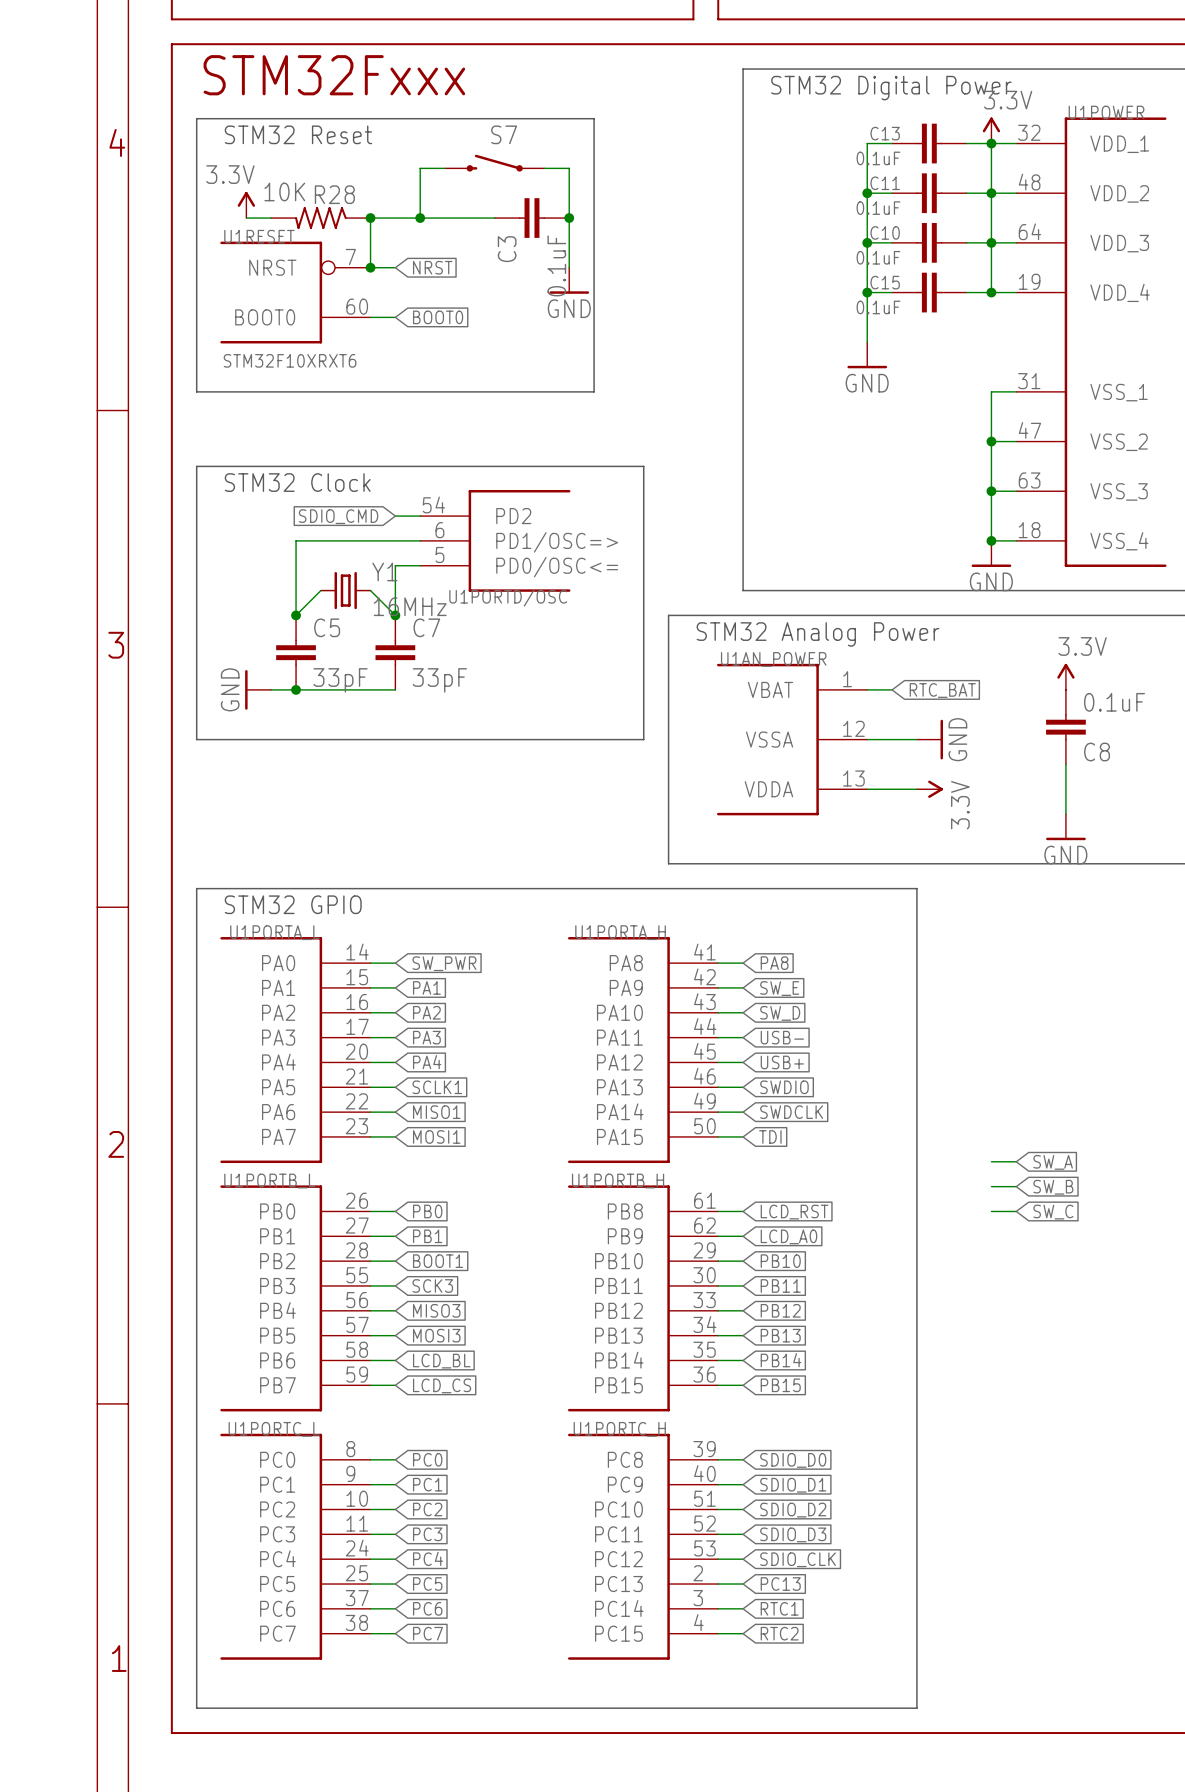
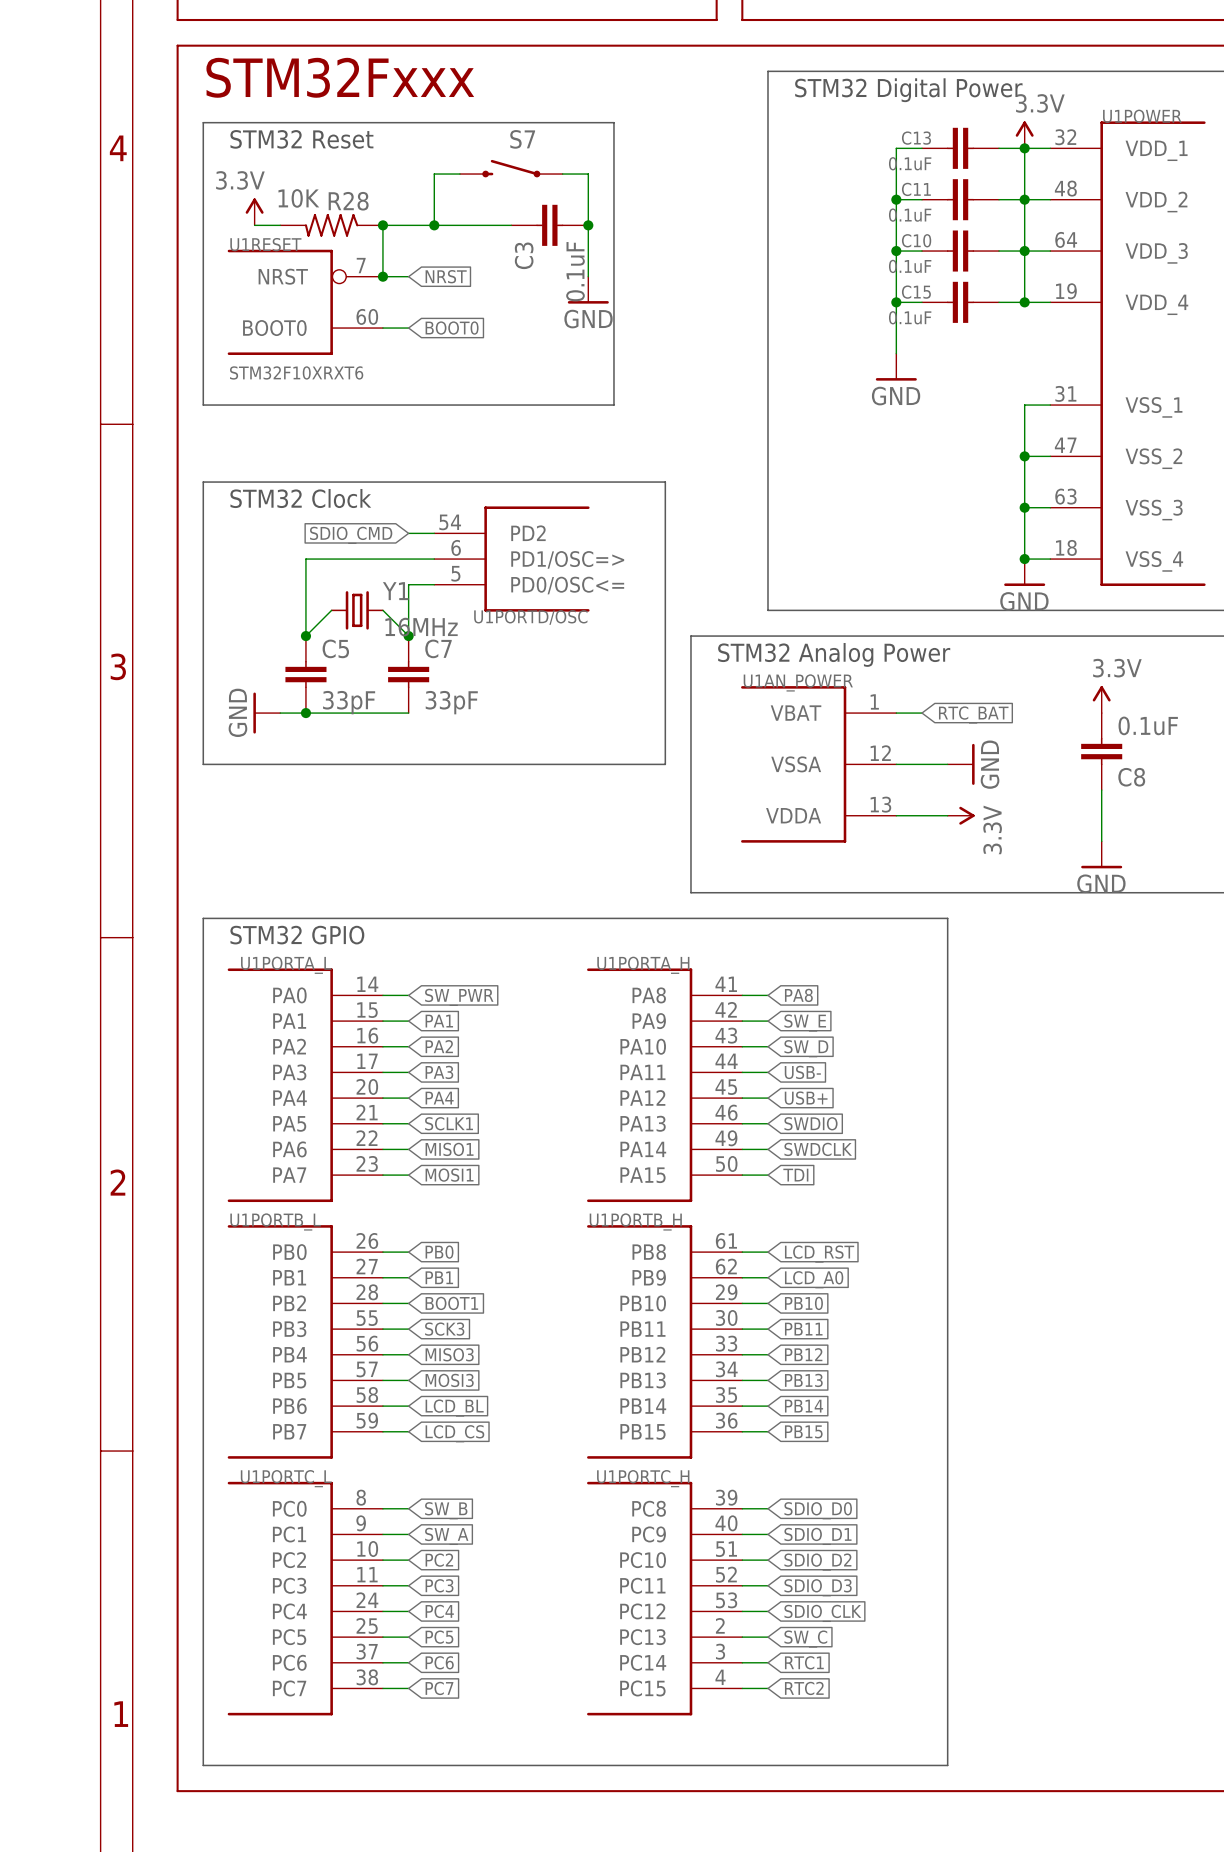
wire: (991, 1161) (1016, 1161) -> none
global label: SW_A (1053, 1162) -> none
wire: (991, 1186) (1016, 1186) -> none
global label: SW_B (1053, 1187) -> none
wire: (991, 1211) (1016, 1211) -> none
global label: SW_C (1053, 1212) -> none
global label: PC0 (427, 1459) -> SW_B (446, 1510)
global label: PC1 (427, 1484) -> SW_A (446, 1536)
global label: PC13 (780, 1584) -> SW_C (805, 1639)

